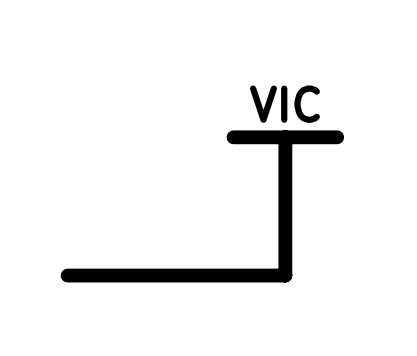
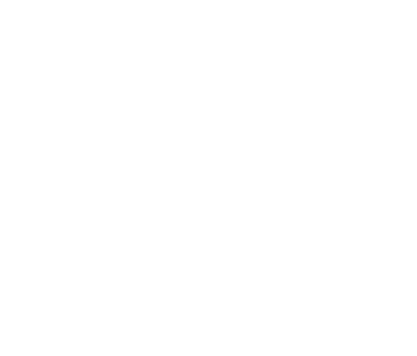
text: VIC (284, 104) -> none
line: (233, 137) (337, 137) -> none
line: (285, 137) (285, 275) (67, 275) -> none

